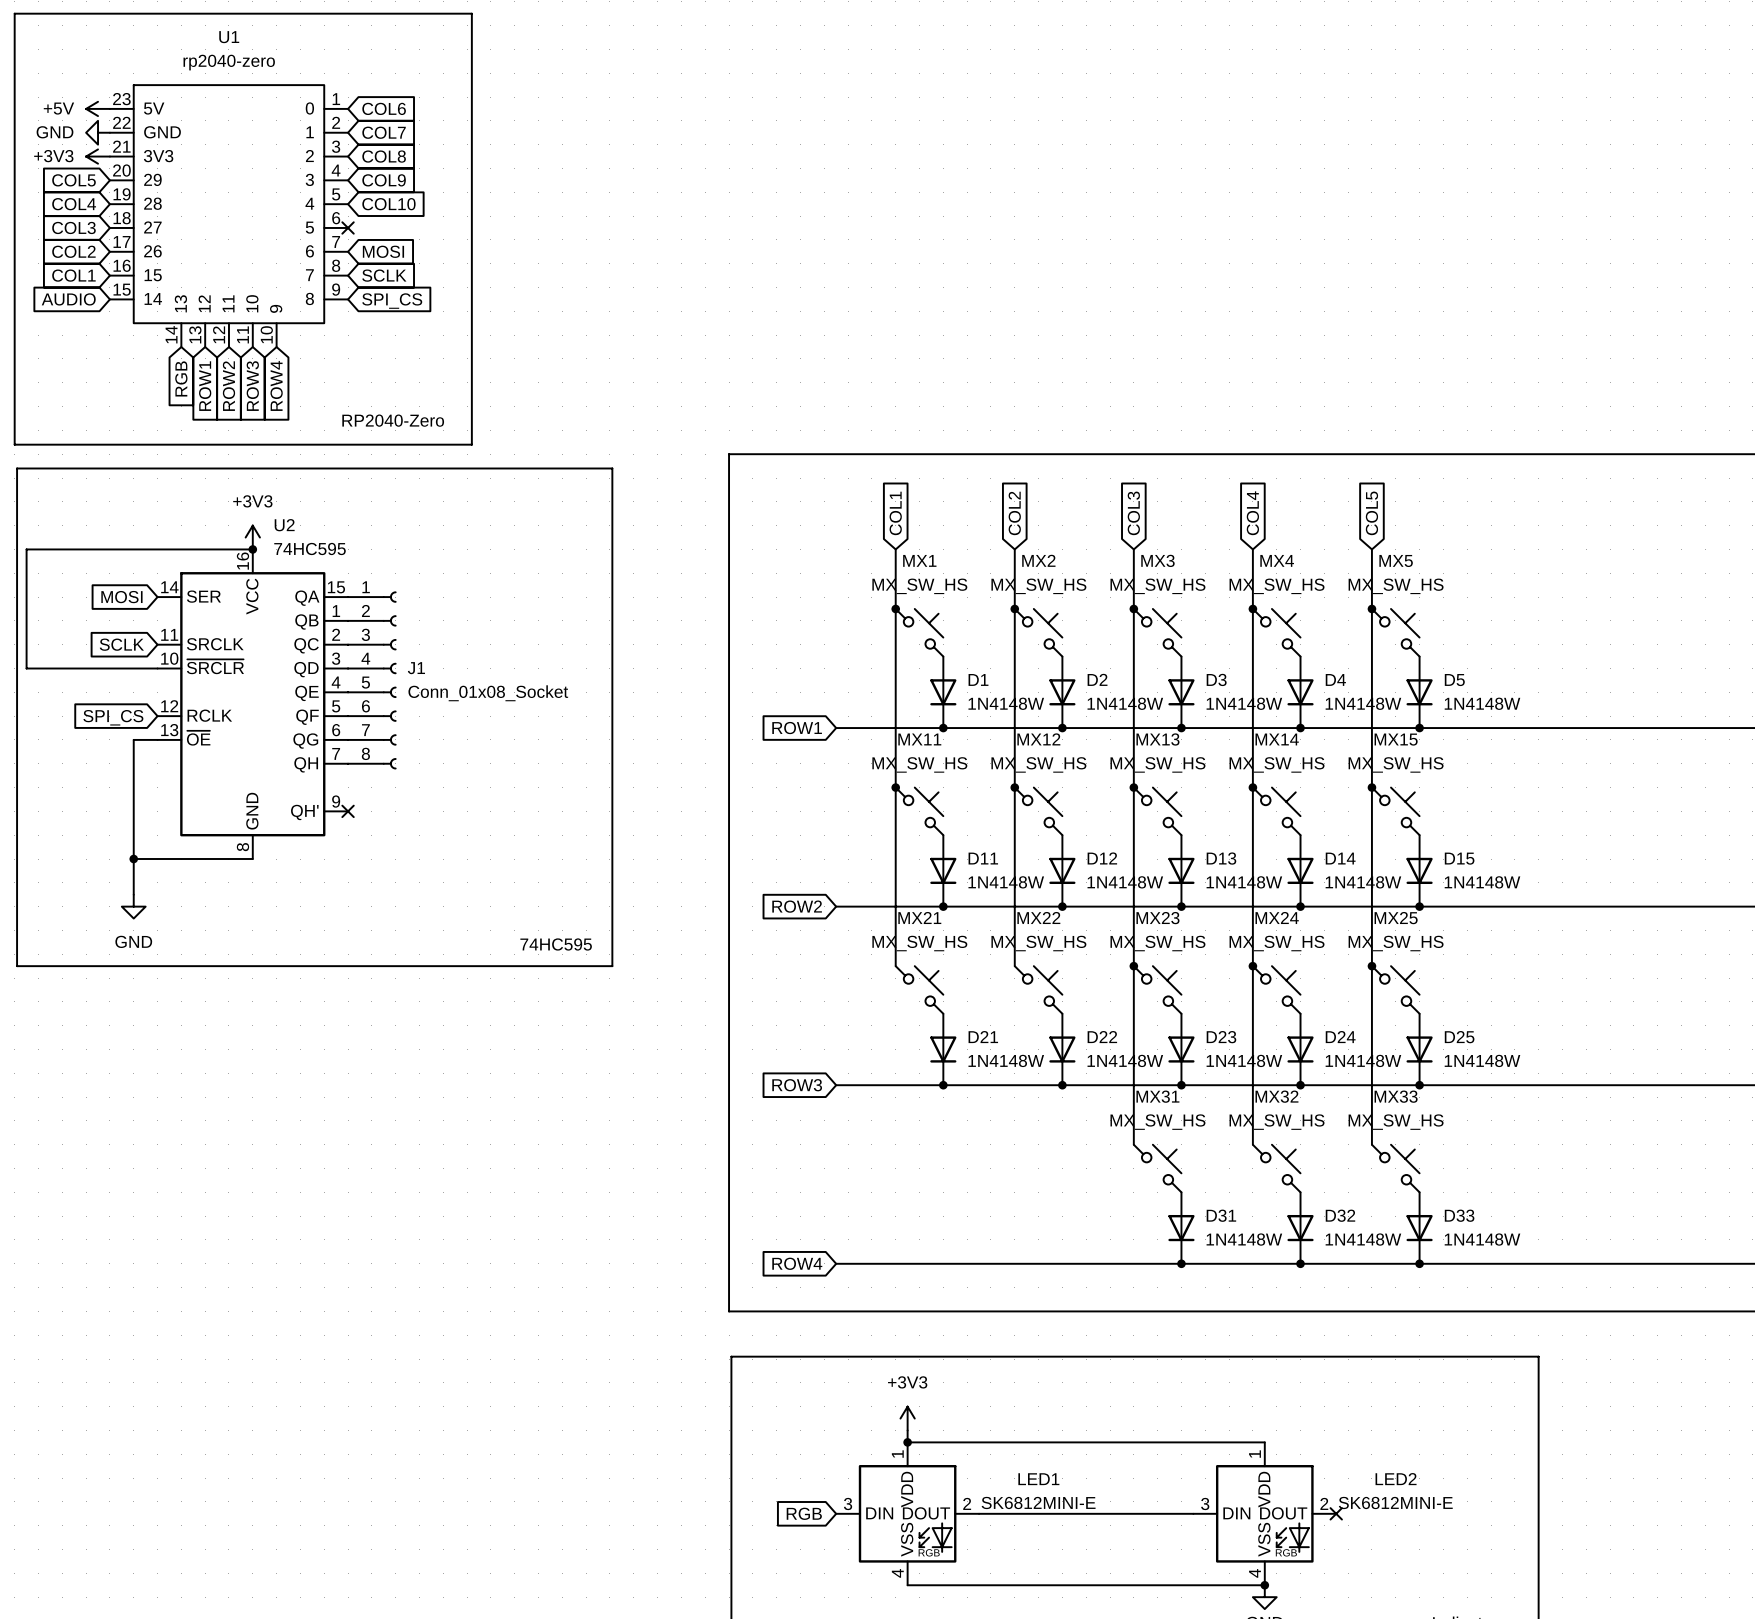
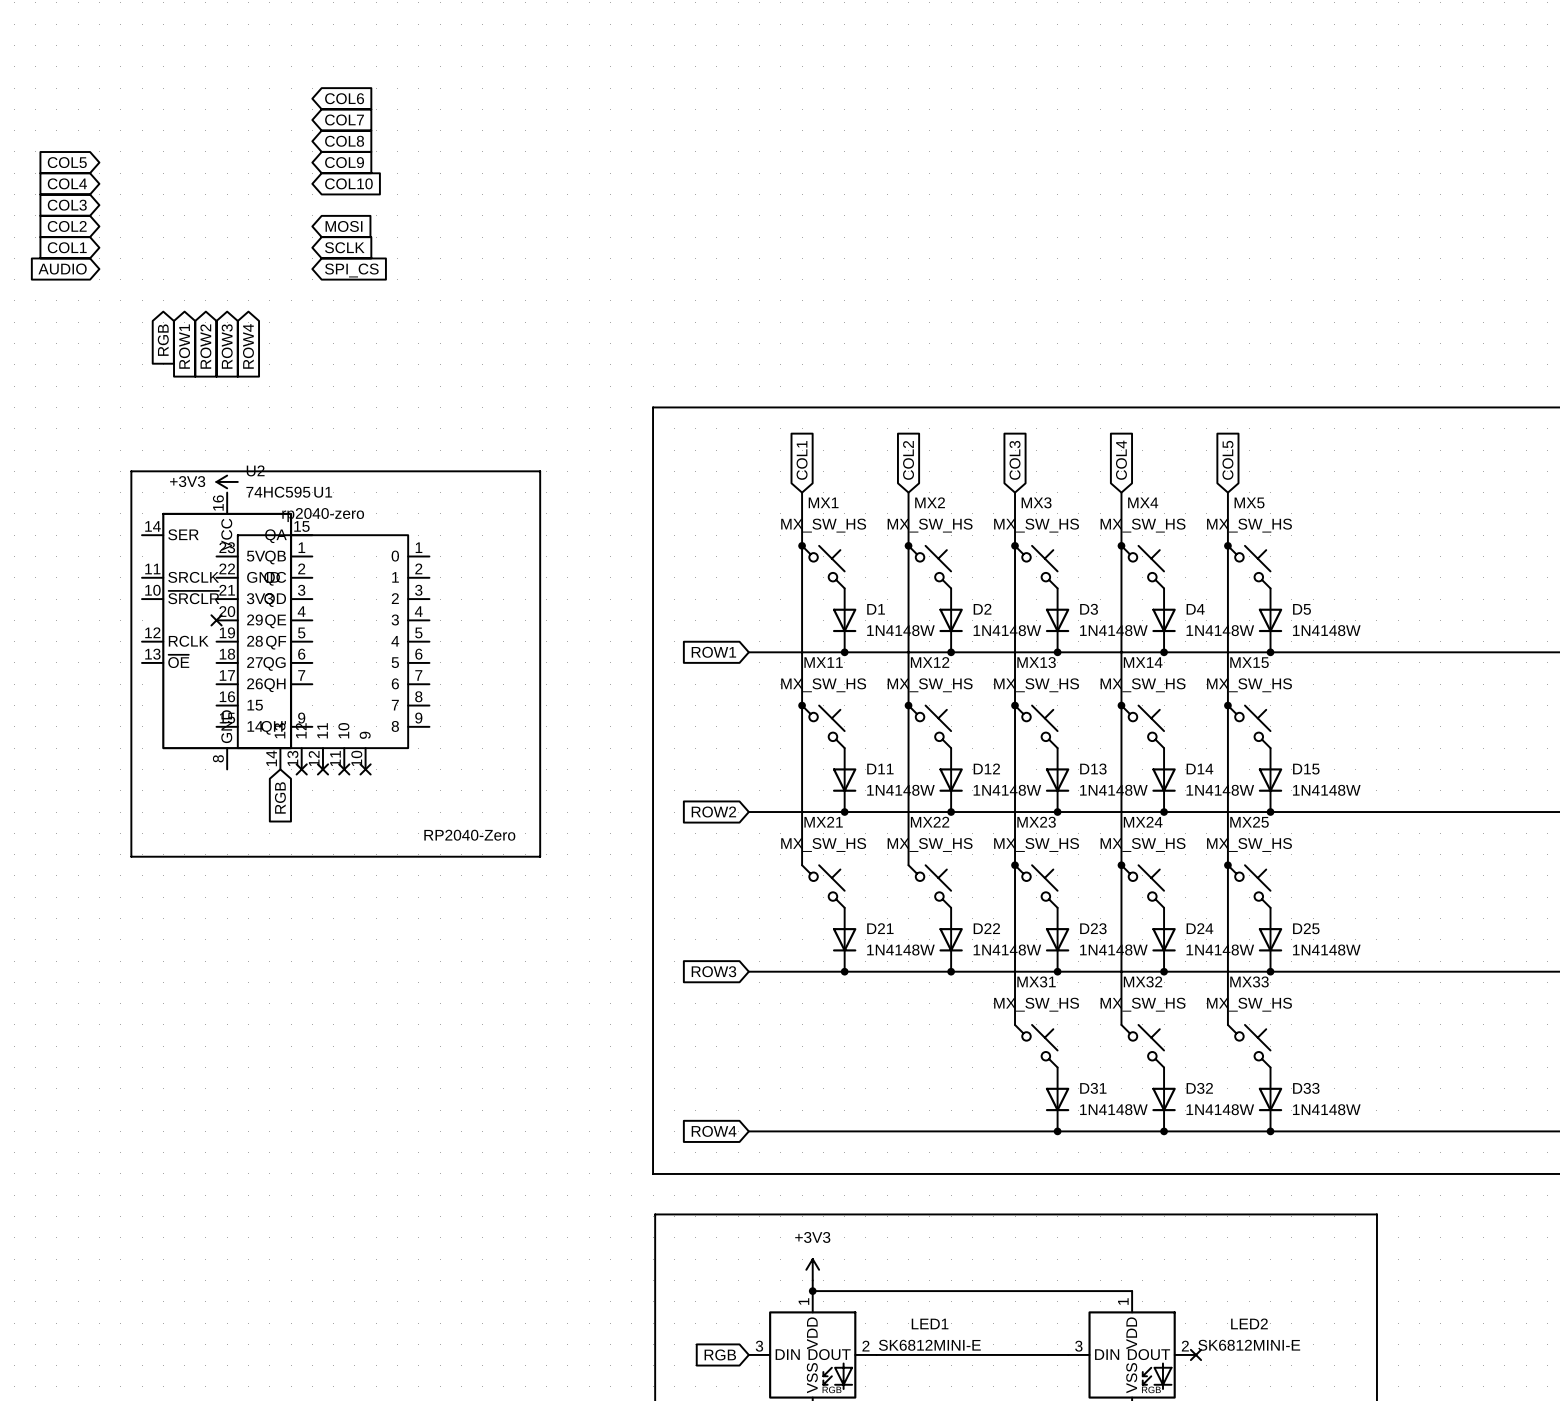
line: (14, 13) (471, 13) (471, 444) (14, 444) (14, 13) -> none
power symbol: +5V (98, 108) -> none
power symbol: GND (98, 132) -> none
power symbol: +3V3 (98, 156) -> none
U1 position: (228, 216) -> (322, 652)
no-connect mark: (348, 227) -> none
text: RP2040-Zero (393, 420) -> none
line: (17, 468) (612, 468) (612, 966) (17, 966) (17, 468) -> (131, 471) (131, 856) (540, 856) (540, 471) (131, 471)
power symbol rotation: 0° (252, 537) -> 90° counterclockwise (227, 481)
wire: (252, 549) (26, 549) (26, 668) (157, 668) -> none
junction: (252, 549) -> none
global label: MOSI (121, 597) -> none
global label: SCLK (121, 644) -> none
J1: Conn_01x08_Socket (372, 680) -> none
no-connect mark: none -> (216, 620)
global label: SPI_CS (113, 717) -> none
wire: (157, 739) (133, 739) (133, 894) -> none
no-connect mark: (348, 811) -> none
wire: (133, 859) (252, 859) -> none
junction: (133, 859) -> none
no-connect mark: none -> (301, 769)
no-connect mark: none -> (322, 769)
no-connect mark: none -> (344, 769)
no-connect mark: none -> (365, 769)
global label: none -> RGB (280, 797)
power symbol: GND (133, 906) -> none
text: none -> RP2040-Zero (469, 835)
text: 74HC595 (556, 944) -> none

